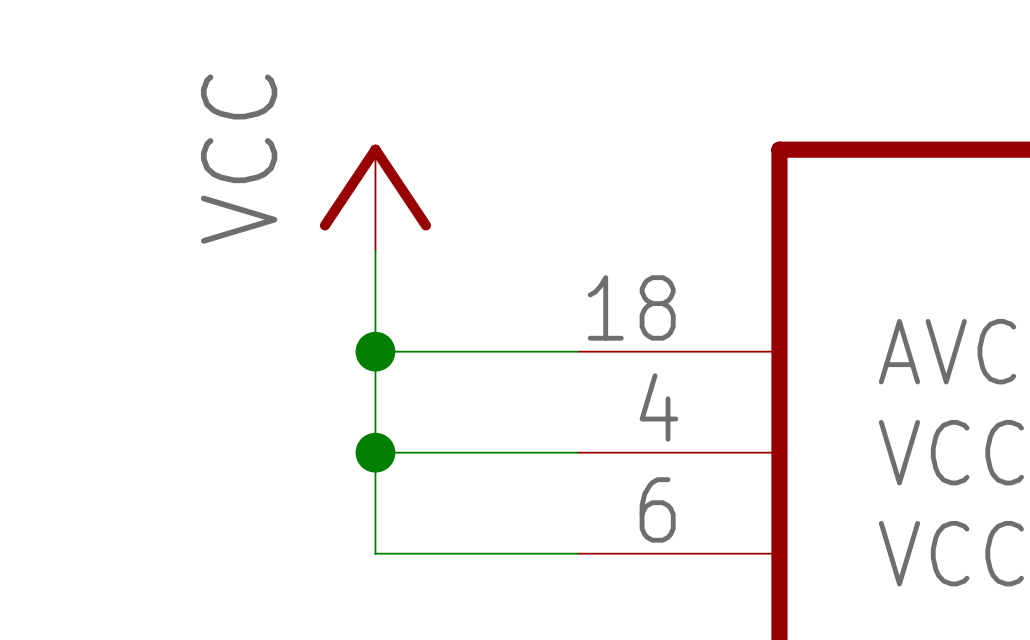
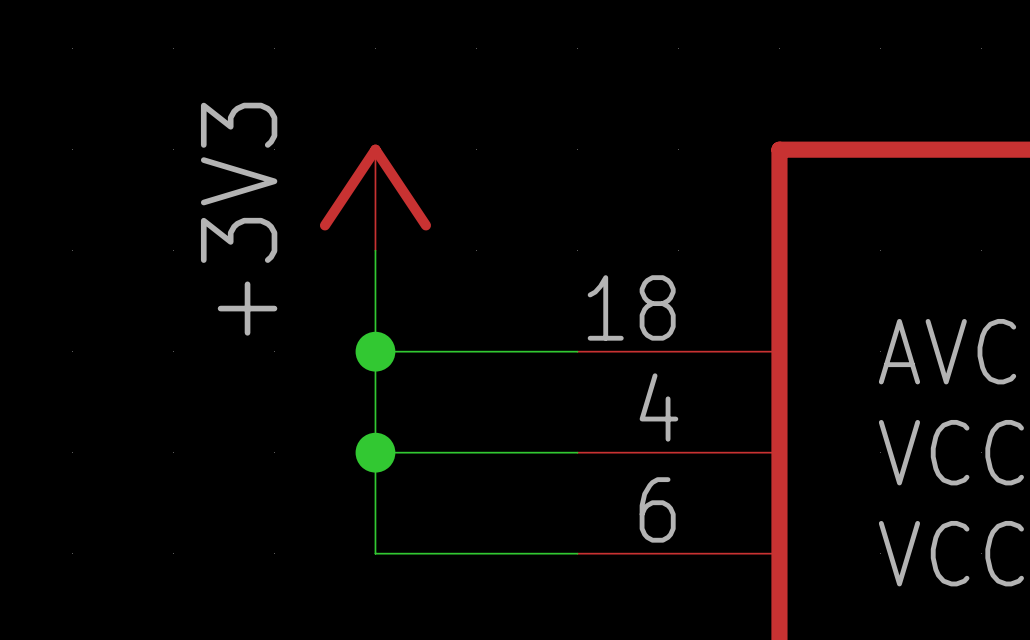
power symbol: VCC (375, 197) -> +3V3 (375, 197)

